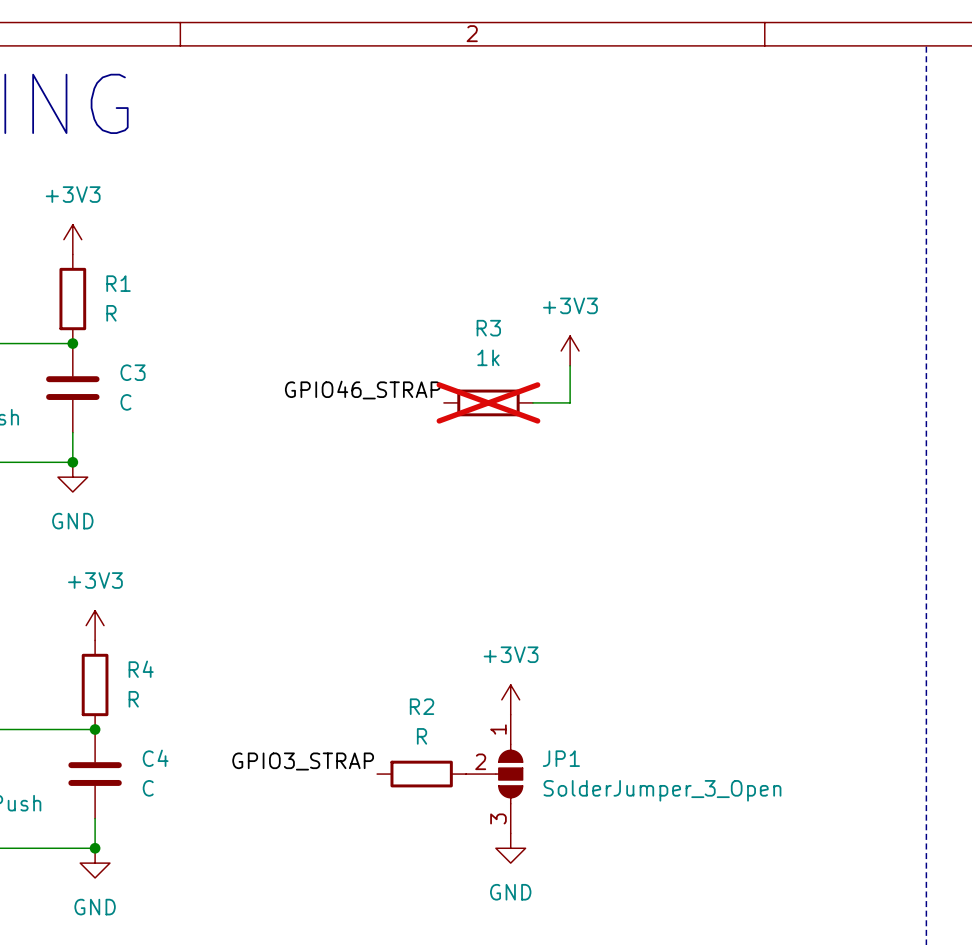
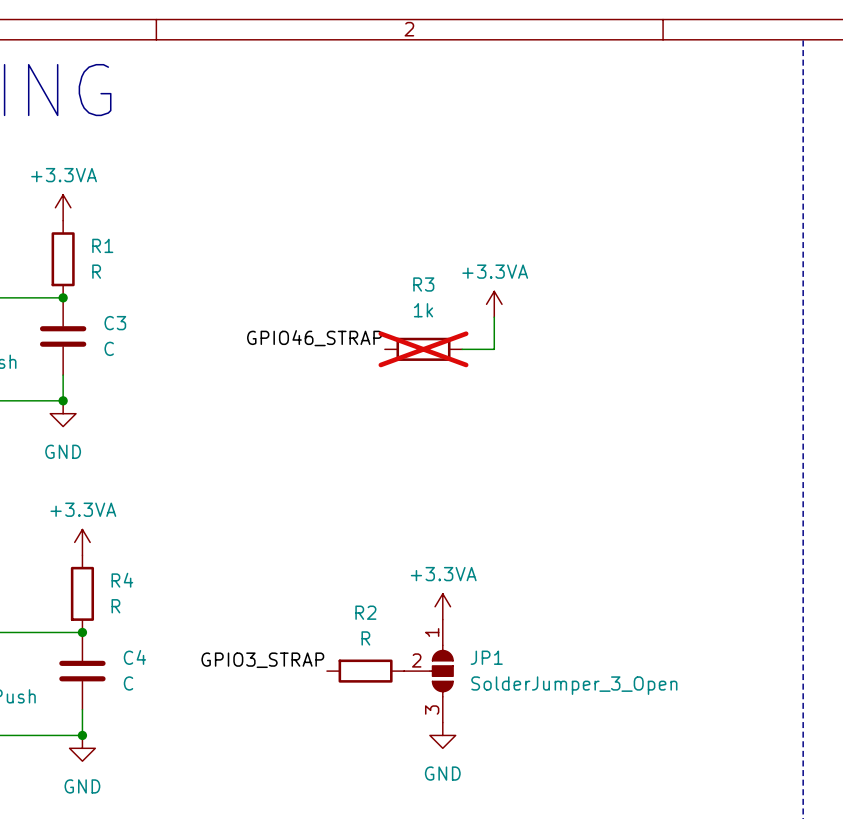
power symbol: +3V3 (72, 239) -> +3.3VA (63, 207)
power symbol: +3V3 (570, 350) -> +3.3VA (494, 304)
power symbol: +3V3 (95, 625) -> +3.3VA (82, 542)
power symbol: +3V3 (510, 699) -> +3.3VA (442, 606)

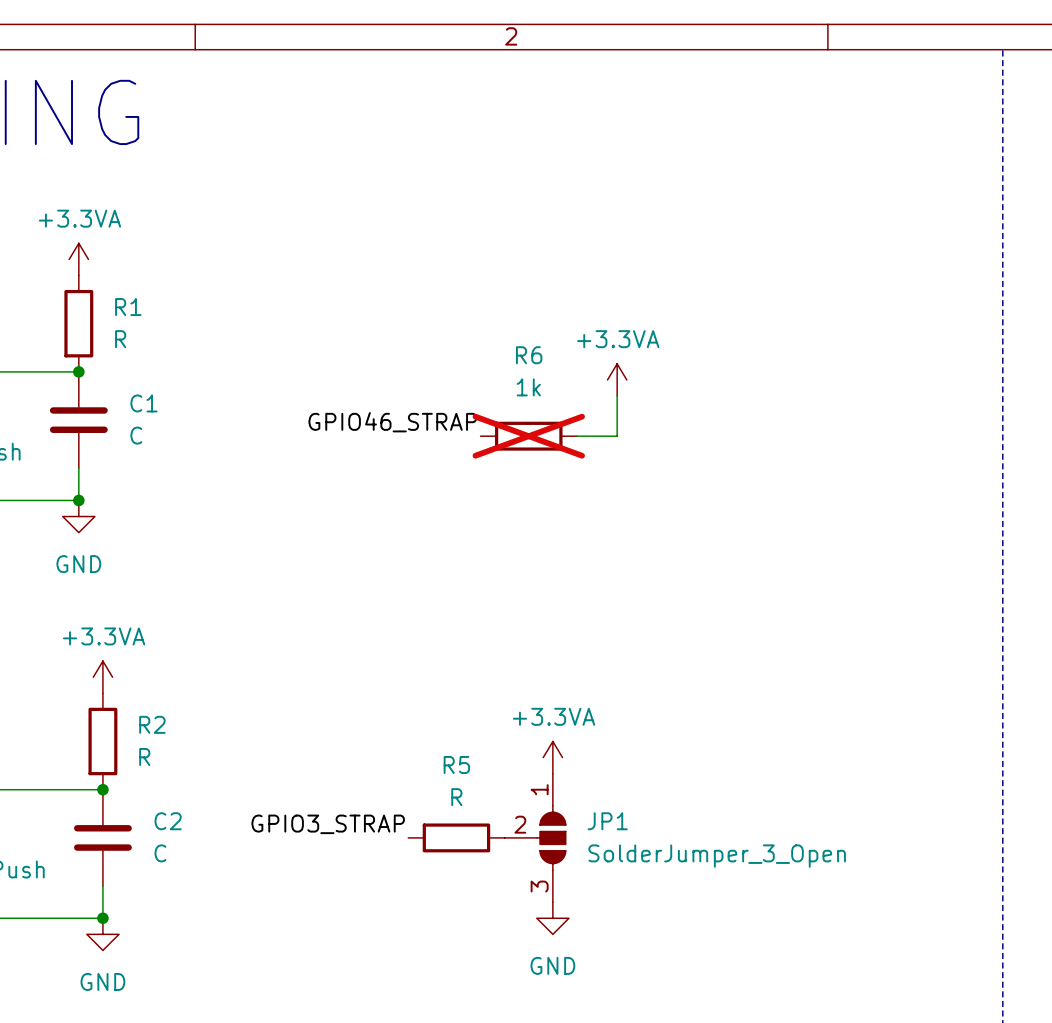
R3 name: R3 (423, 284) -> R6 (529, 355)
C3 name: C3 (115, 323) -> C1 (143, 403)
R4 name: R4 (122, 580) -> R2 (152, 724)
R2 name: R2 (365, 612) -> R5 (456, 765)
C4 name: C4 (134, 657) -> C2 (168, 821)

